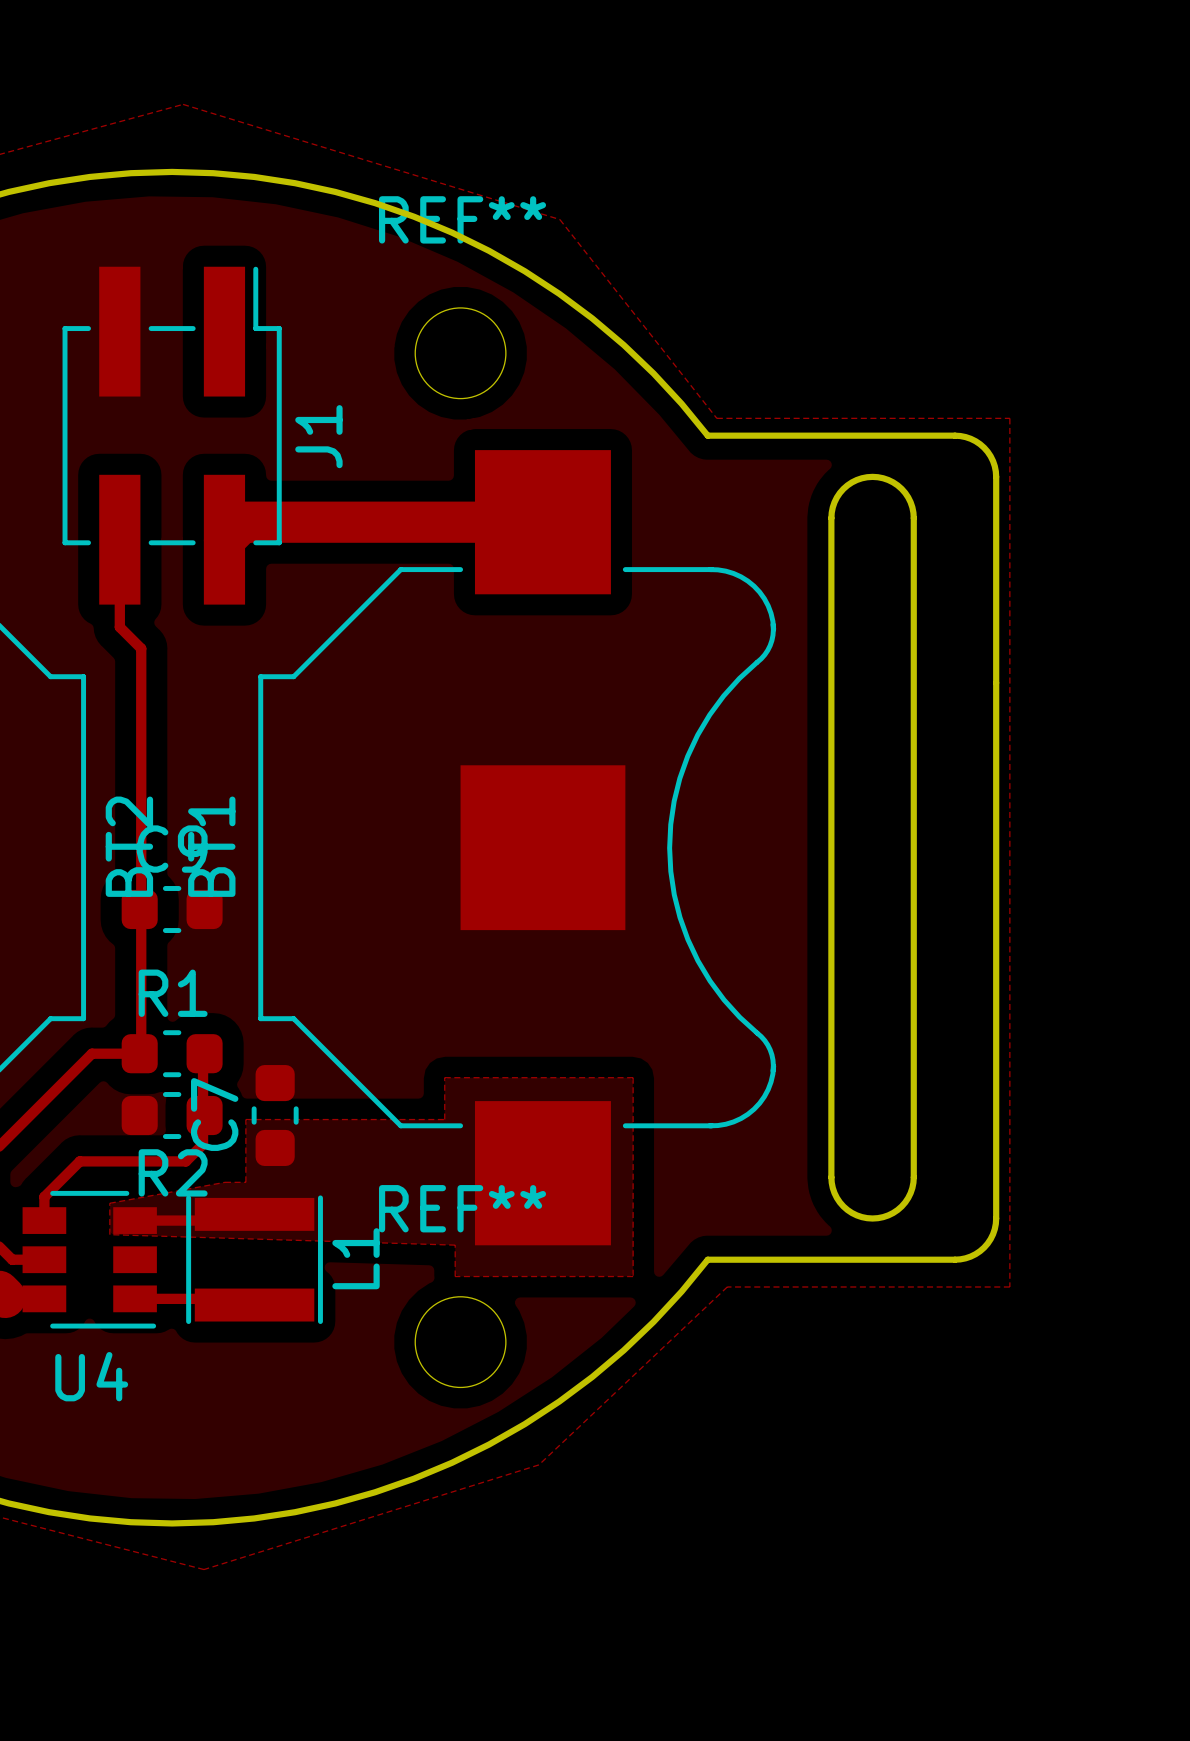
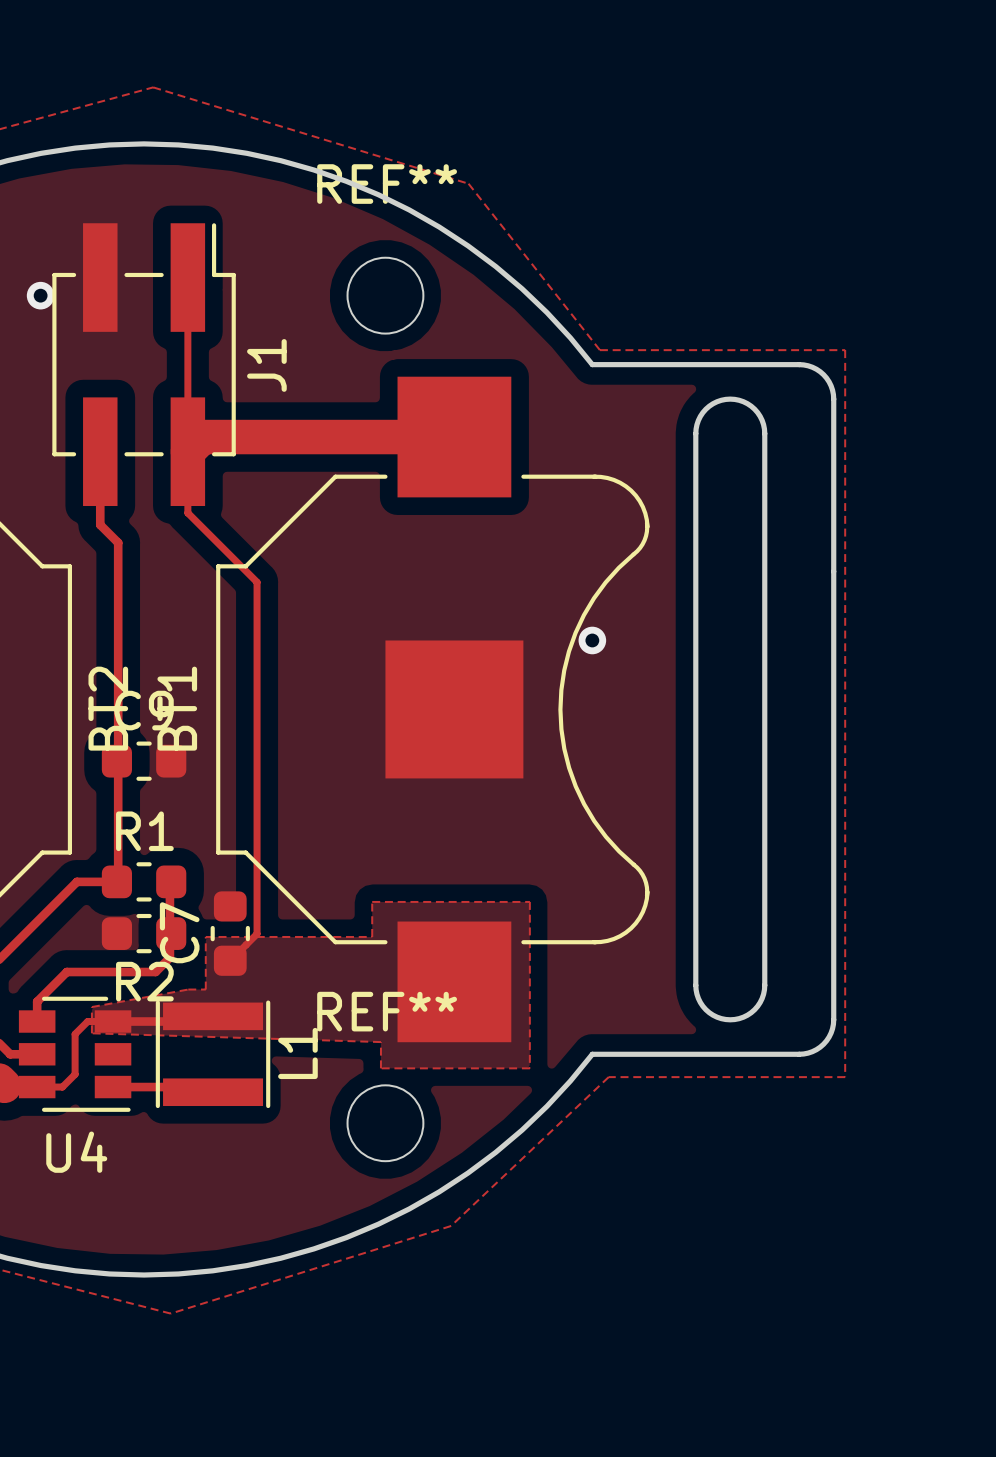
track: none -> (187, 277) (187, 513) (257, 582) (257, 933) (230, 960)
via: none -> (40, 295)
via: none -> (592, 640)
track: none -> (113, 1021) (87, 1021) (75, 1034) (75, 1074) (62, 1087) (37, 1087)

